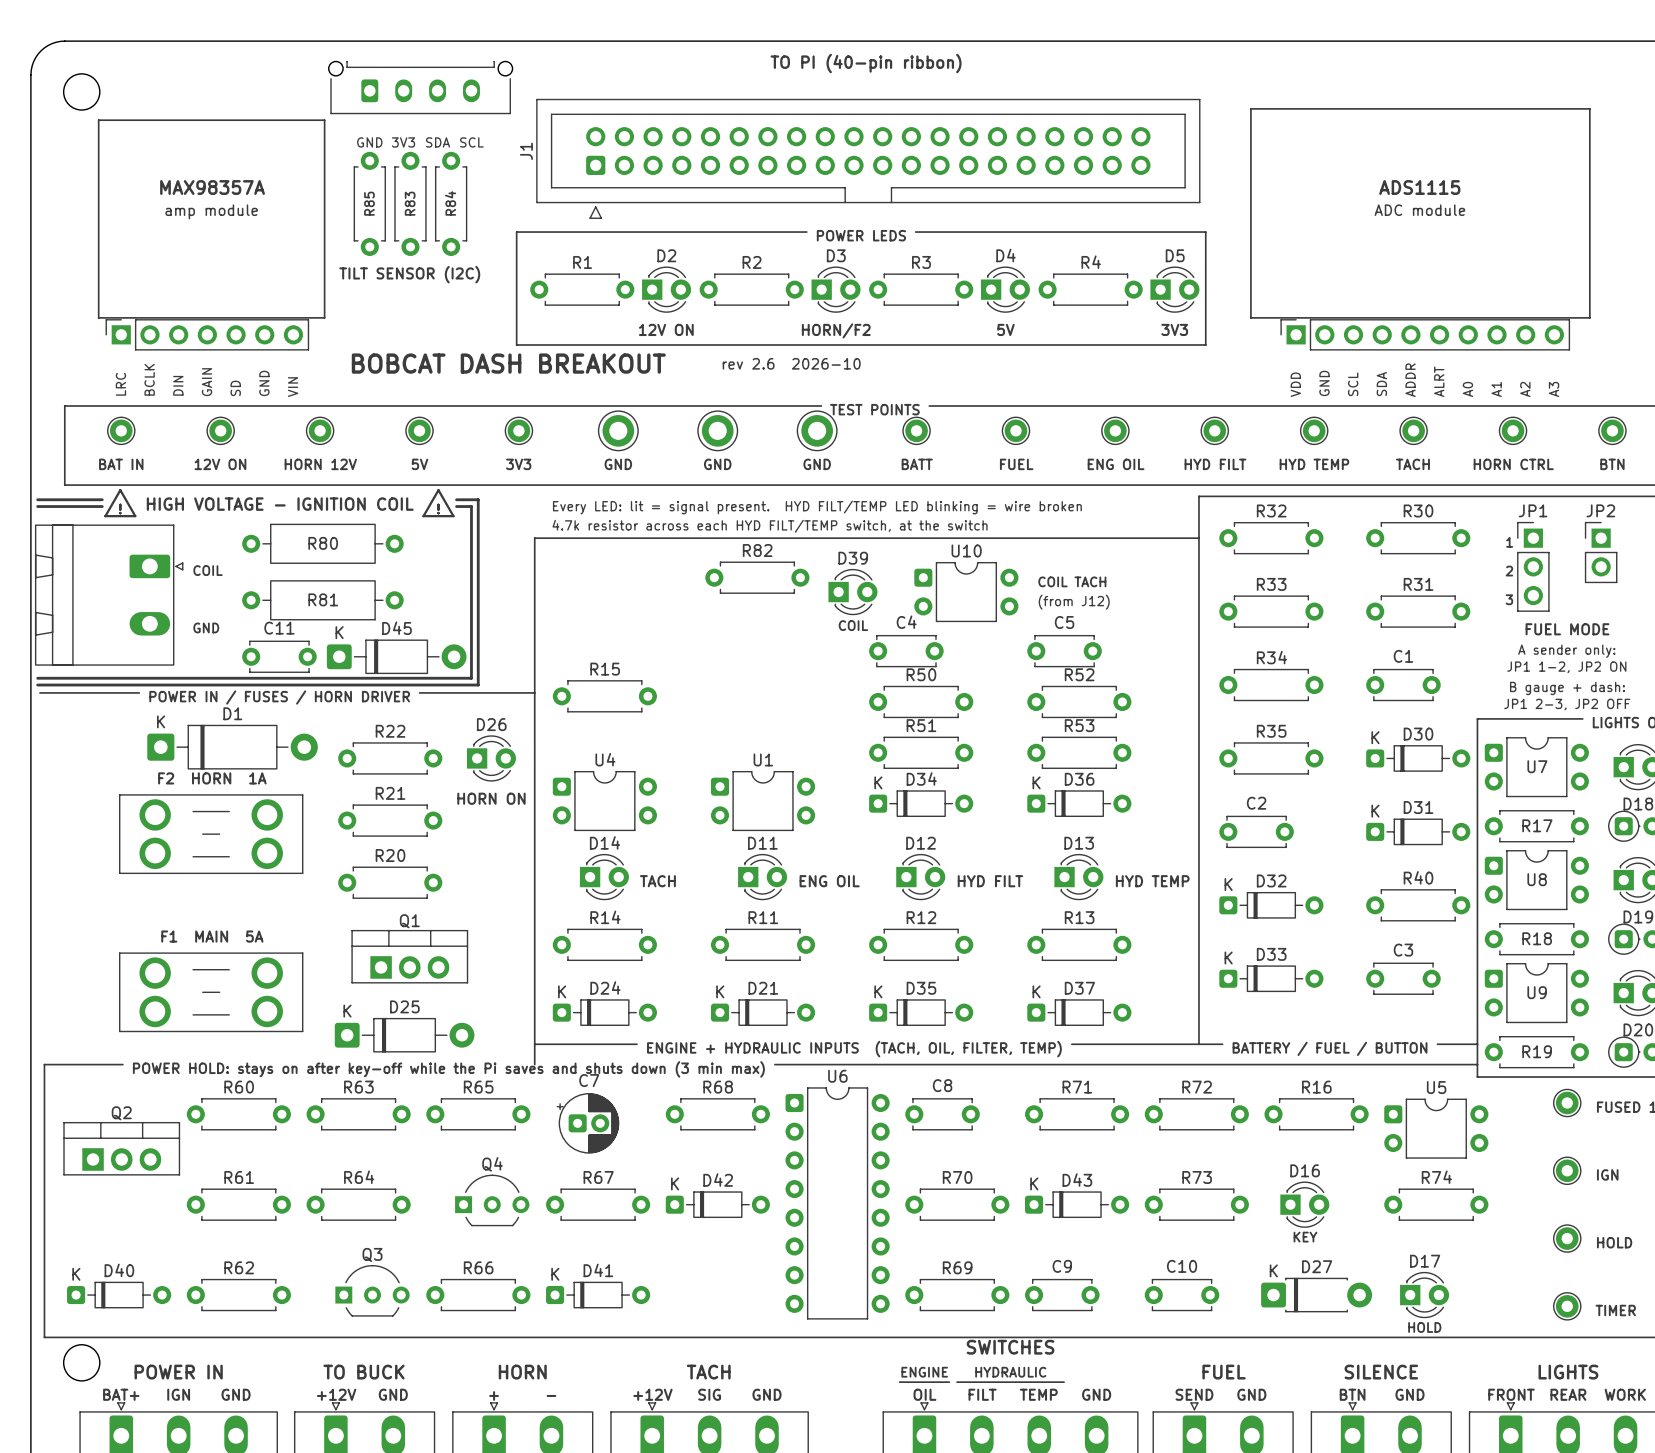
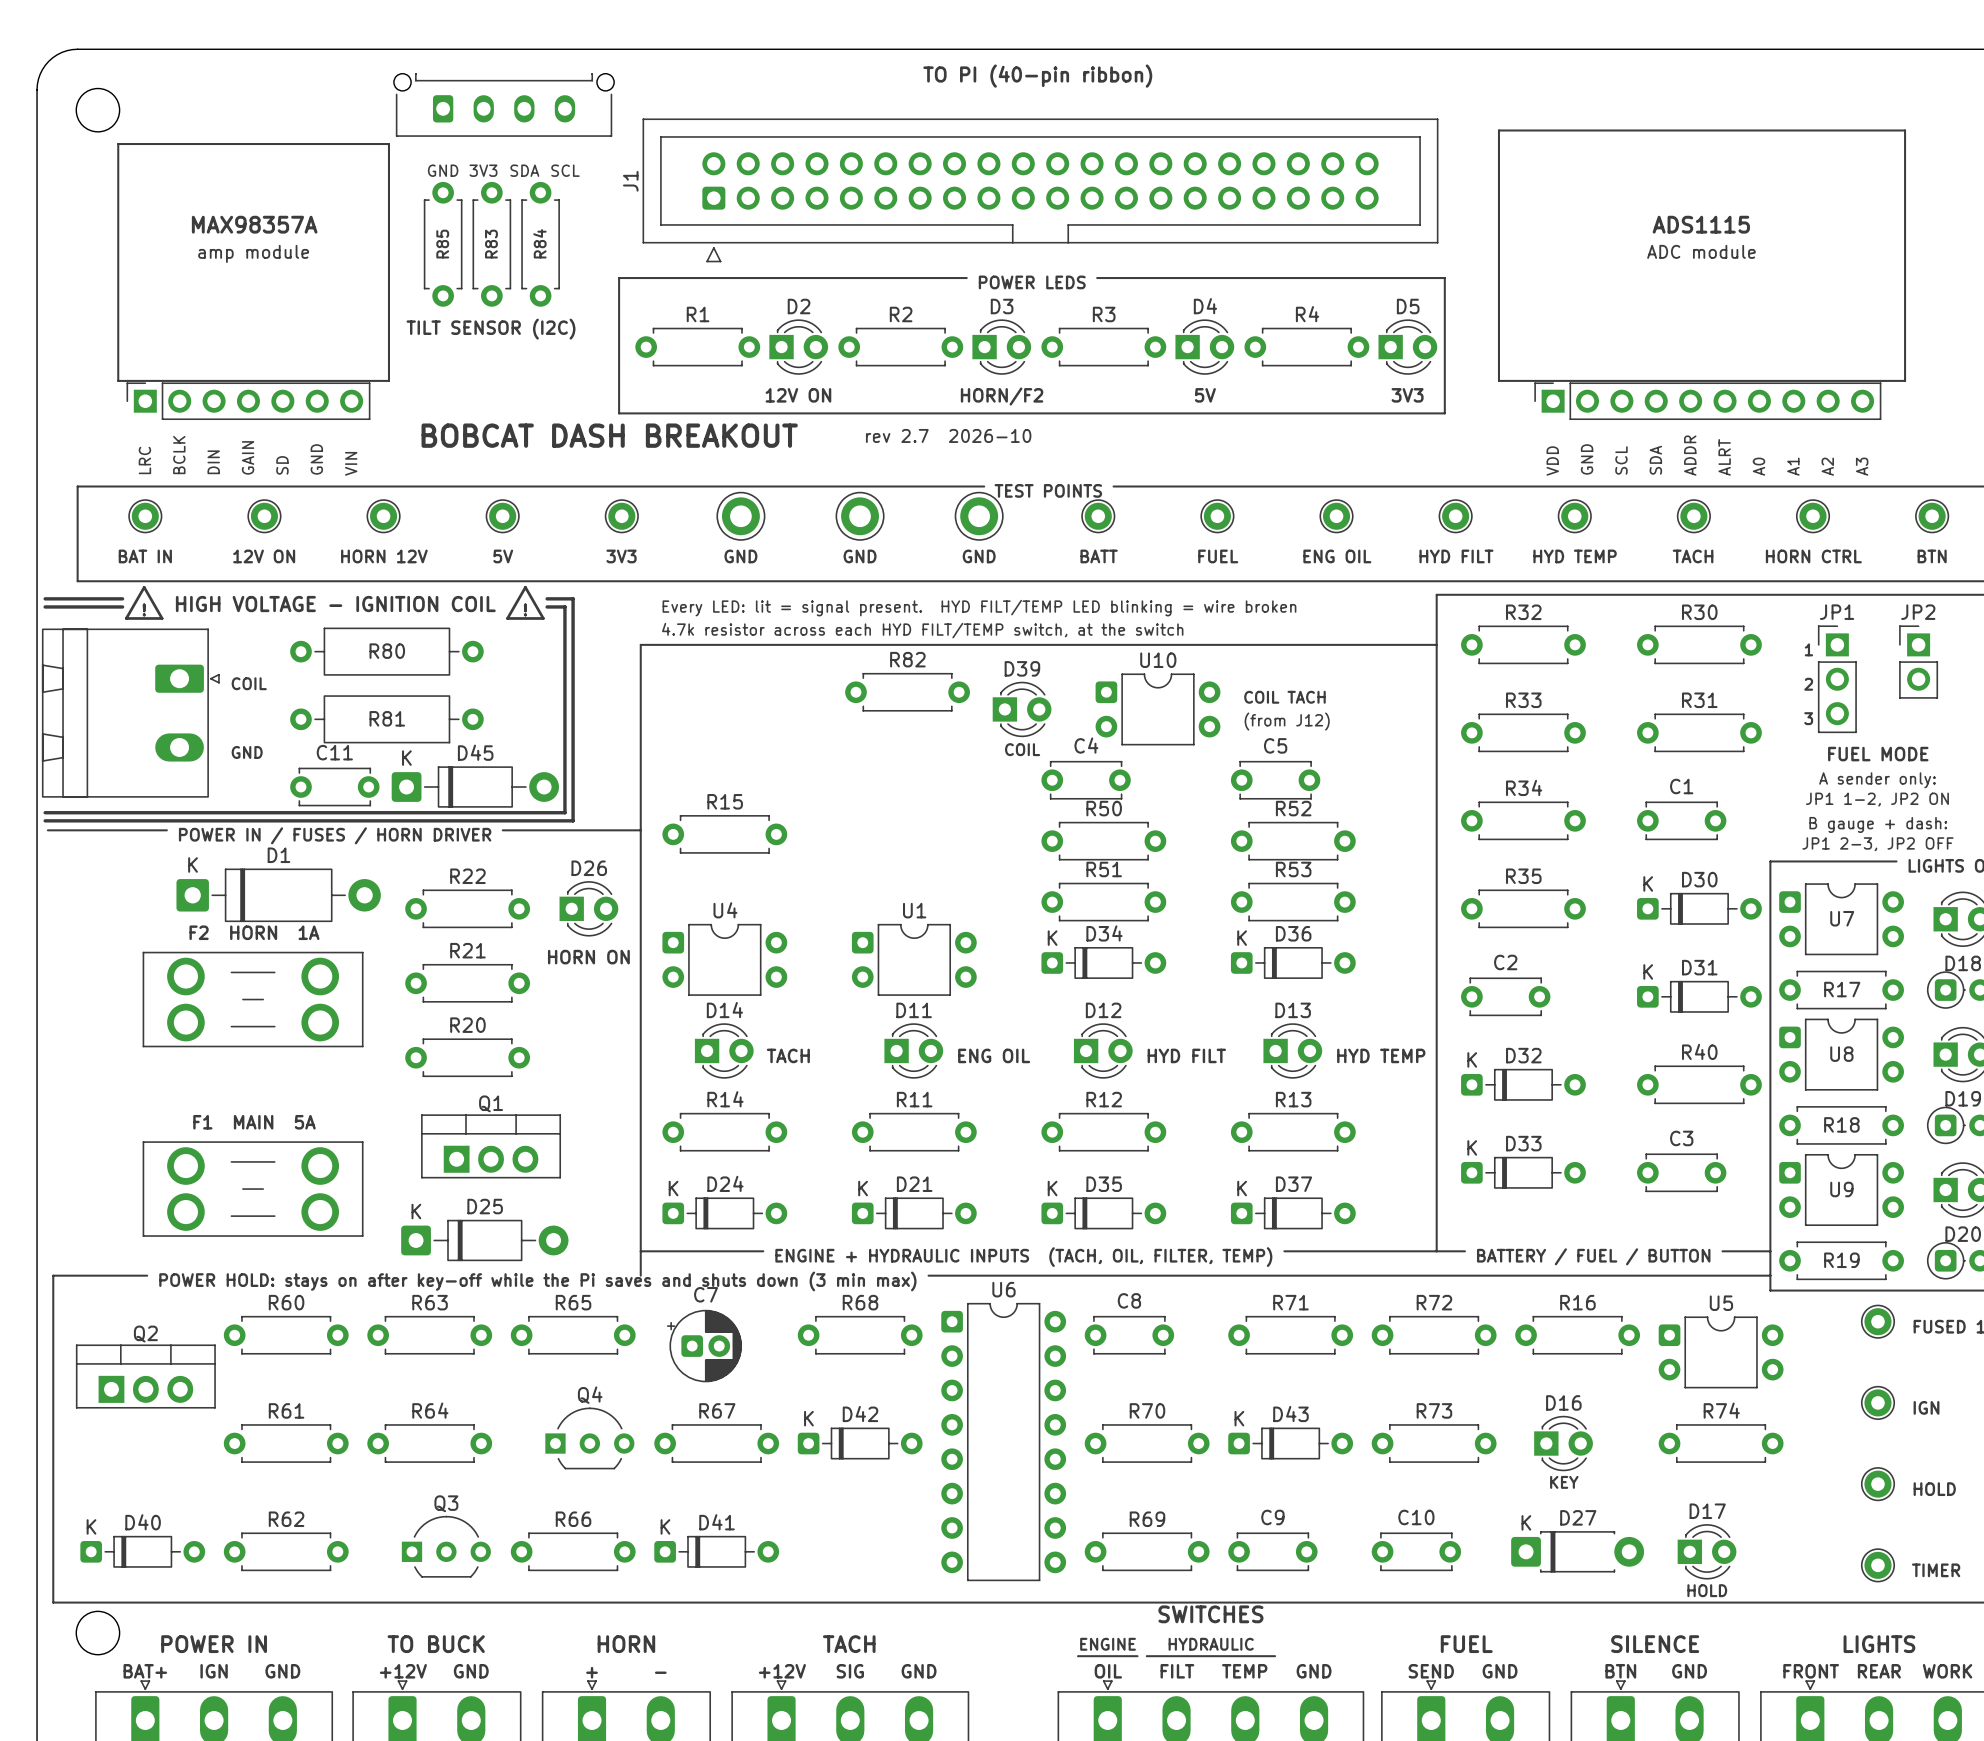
text: rev 2.6 2026-10 (791, 363) -> rev 2.7 2026-10 (948, 435)

